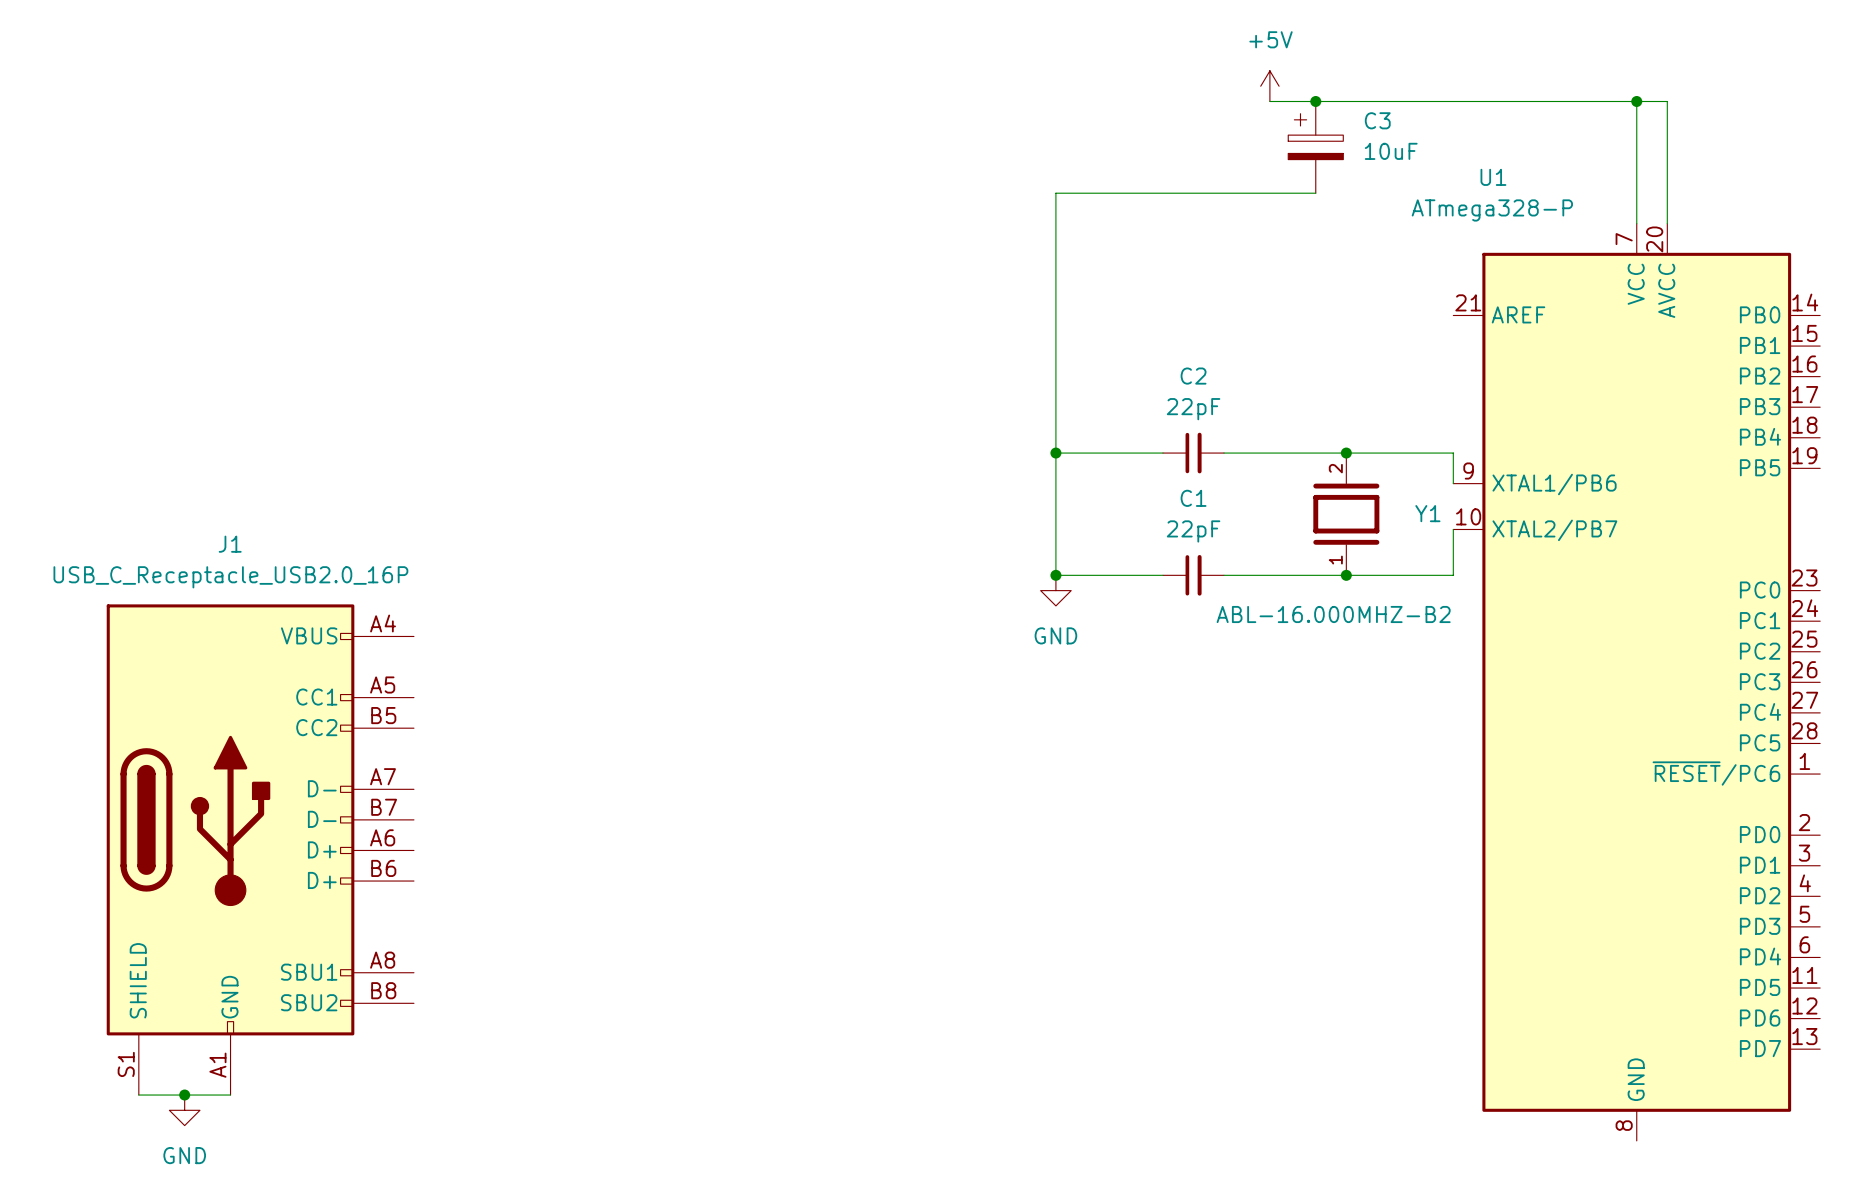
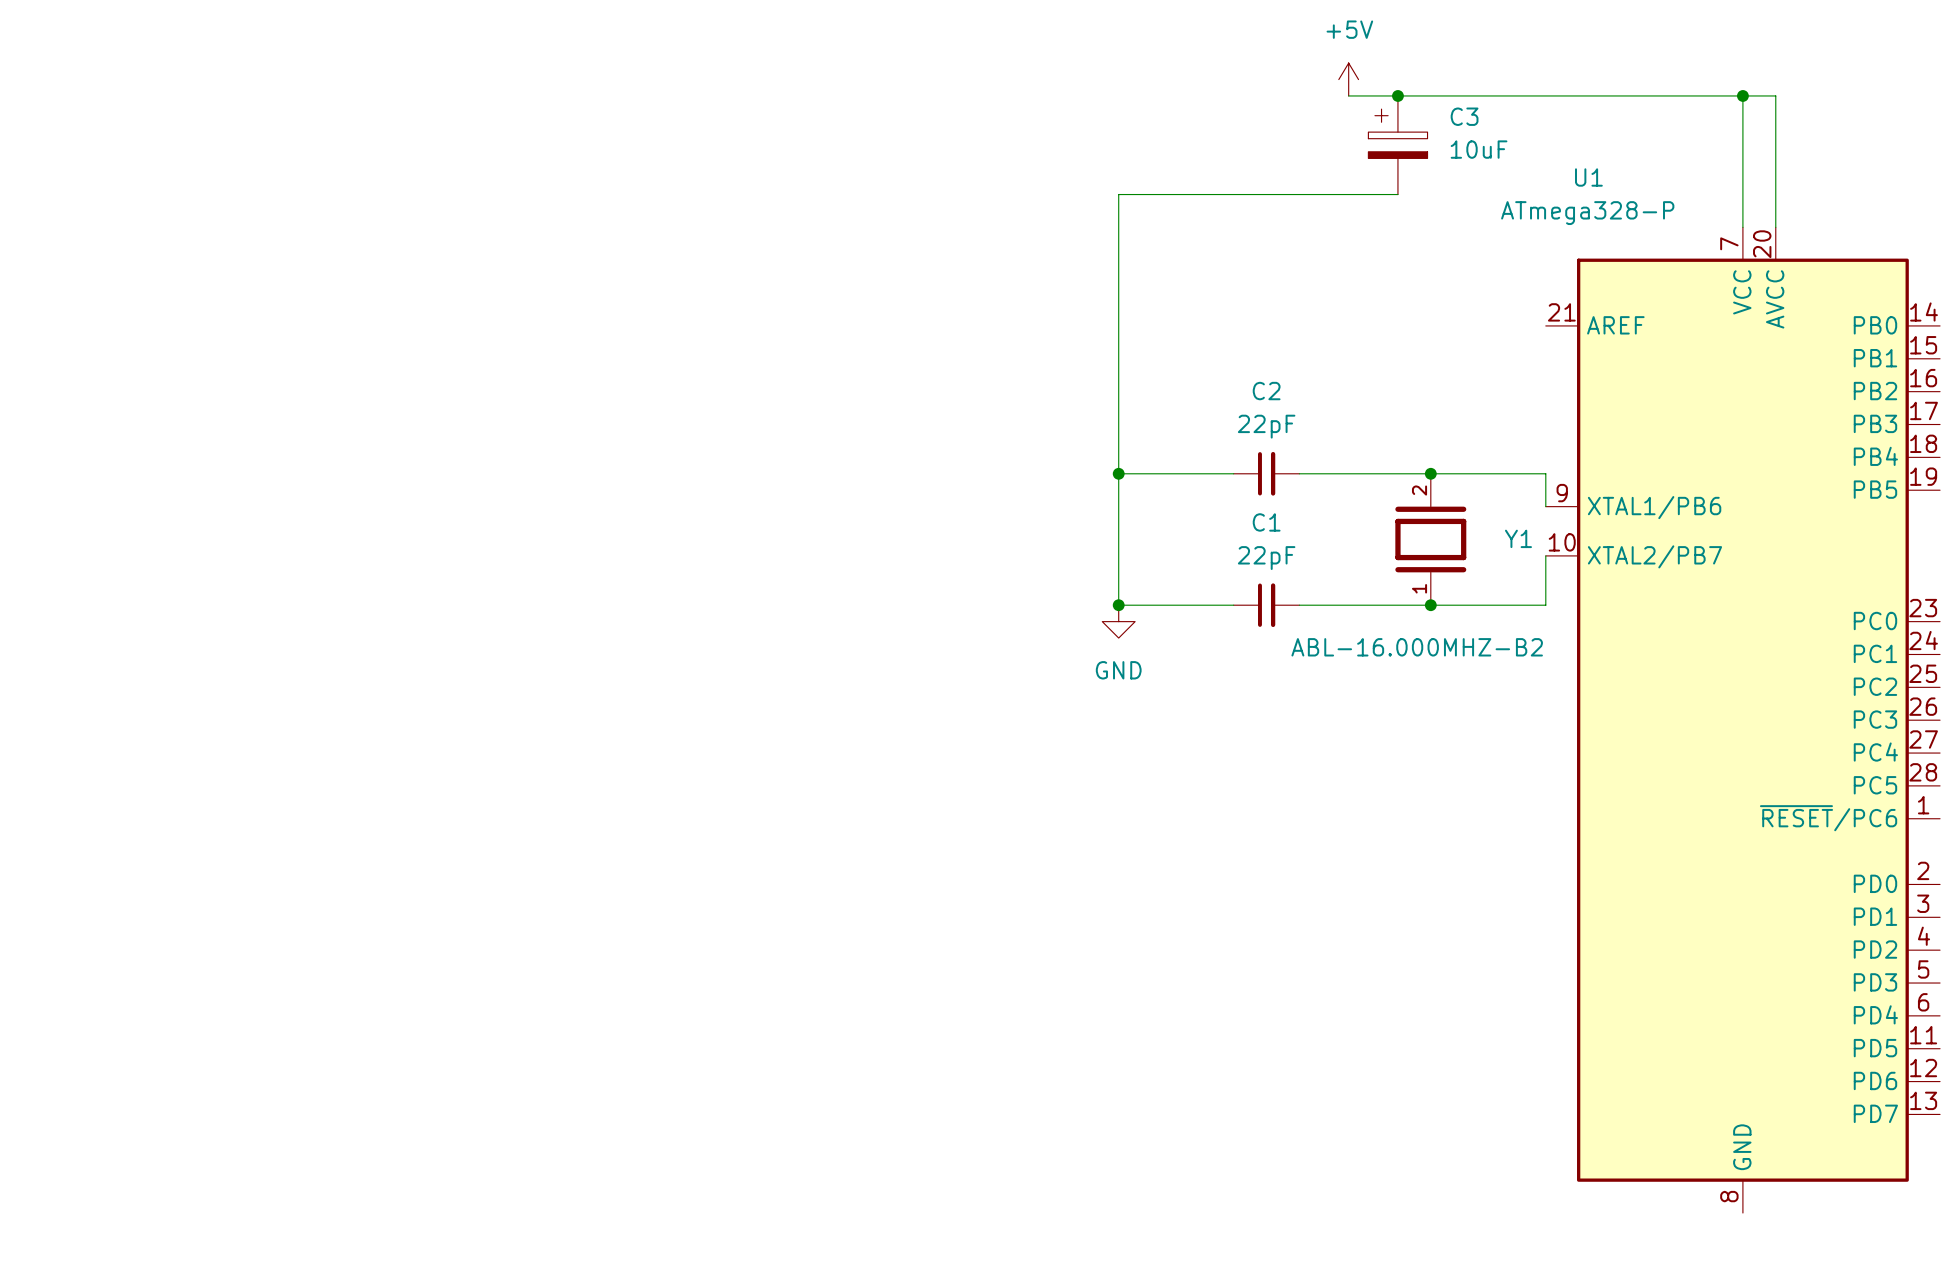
J1: USB_C_Receptacle_USB2.0_16P (260, 849) -> none
wire: (138, 1095) (230, 1095) -> none
junction: (184, 1095) -> none
power symbol: GND (184, 1110) -> none

